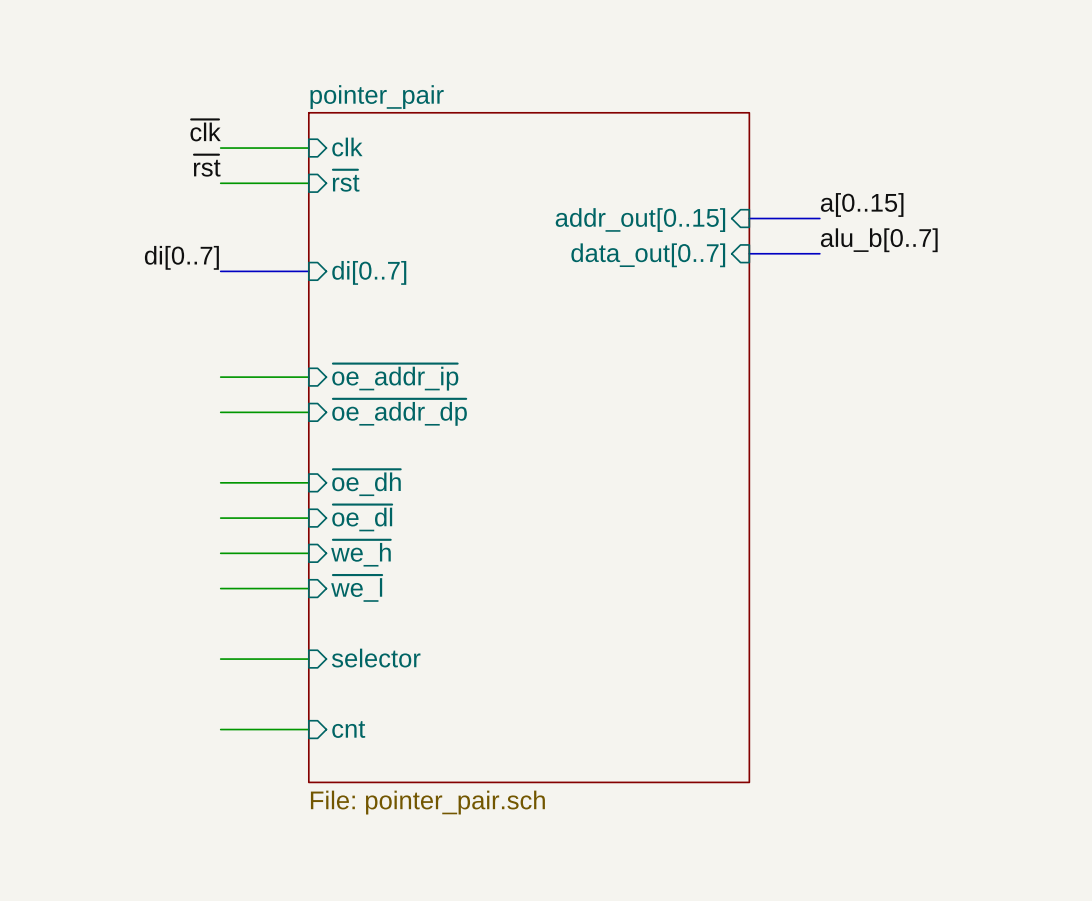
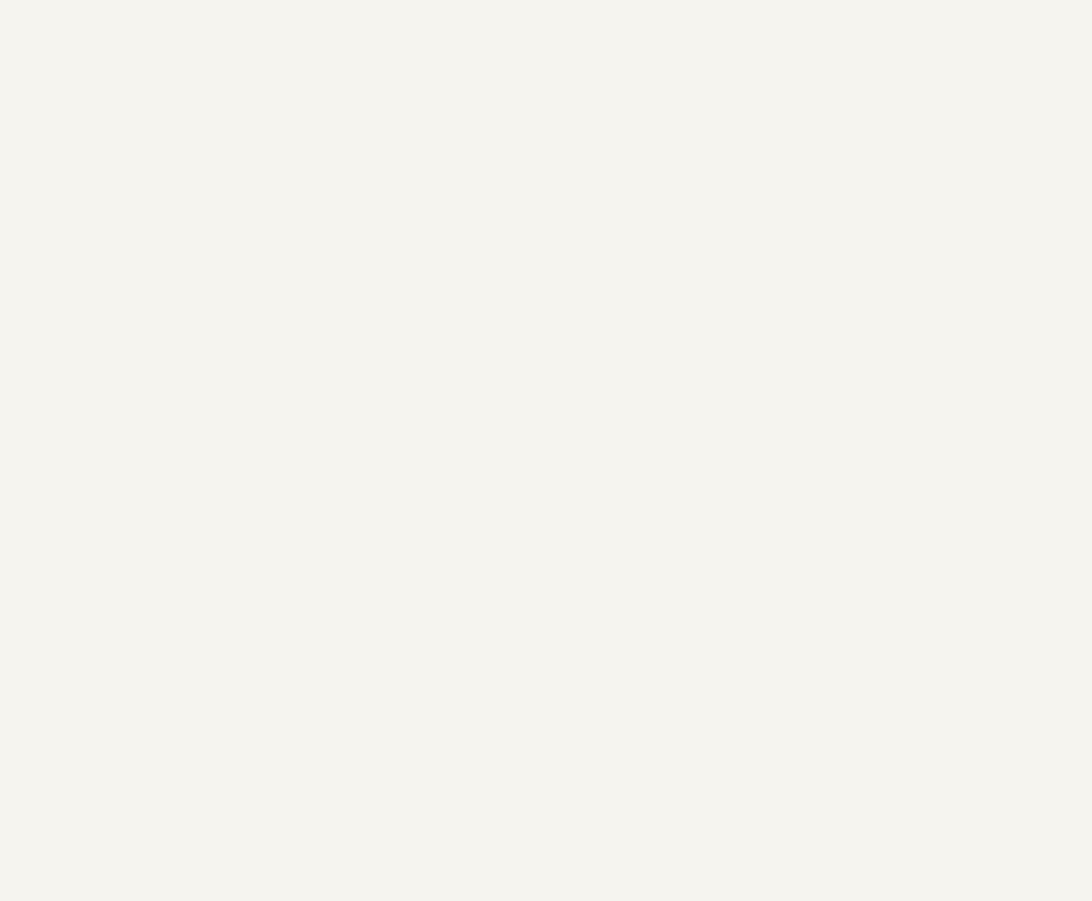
label: ~{clk} (205, 130) -> none
sheet pin: clk (347, 147) -> none
wire: (220, 148) (308, 148) -> none
label: ~{rst} (207, 165) -> none
sheet pin: ~{rst} (346, 180) -> none
wire: (220, 183) (308, 183) -> none
label: a[0..15] (862, 204) -> none
bus: (749, 218) (819, 218) -> none
sheet pin: addr_out[0..15] (640, 220) -> none
label: alu_b[0..7] (879, 240) -> none
bus: (749, 253) (819, 253) -> none
sheet pin: data_out[0..7] (648, 255) -> none
label: di[0..7] (181, 257) -> none
bus: (220, 271) (308, 271) -> none
sheet pin: di[0..7] (369, 272) -> none
wire: (220, 377) (308, 377) -> none
sheet pin: ~{oe_addr_ip} (395, 377) -> none
wire: (220, 412) (308, 412) -> none
sheet pin: ~{oe_addr_dp} (399, 412) -> none
sheet pointer_pair: File: pointer_pair.sch (529, 447) -> none
wire: (220, 482) (308, 482) -> none
sheet pin: ~{oe_dh} (366, 482) -> none
sheet pin: ~{oe_dl} (362, 517) -> none
wire: (220, 518) (308, 518) -> none
wire: (220, 553) (308, 553) -> none
sheet pin: ~{we_h} (360, 553) -> none
wire: (220, 588) (308, 588) -> none
sheet pin: ~{we_l} (356, 588) -> none
sheet pin: selector (376, 658) -> none
wire: (220, 659) (308, 659) -> none
wire: (220, 729) (308, 729) -> none
sheet pin: cnt (348, 729) -> none

